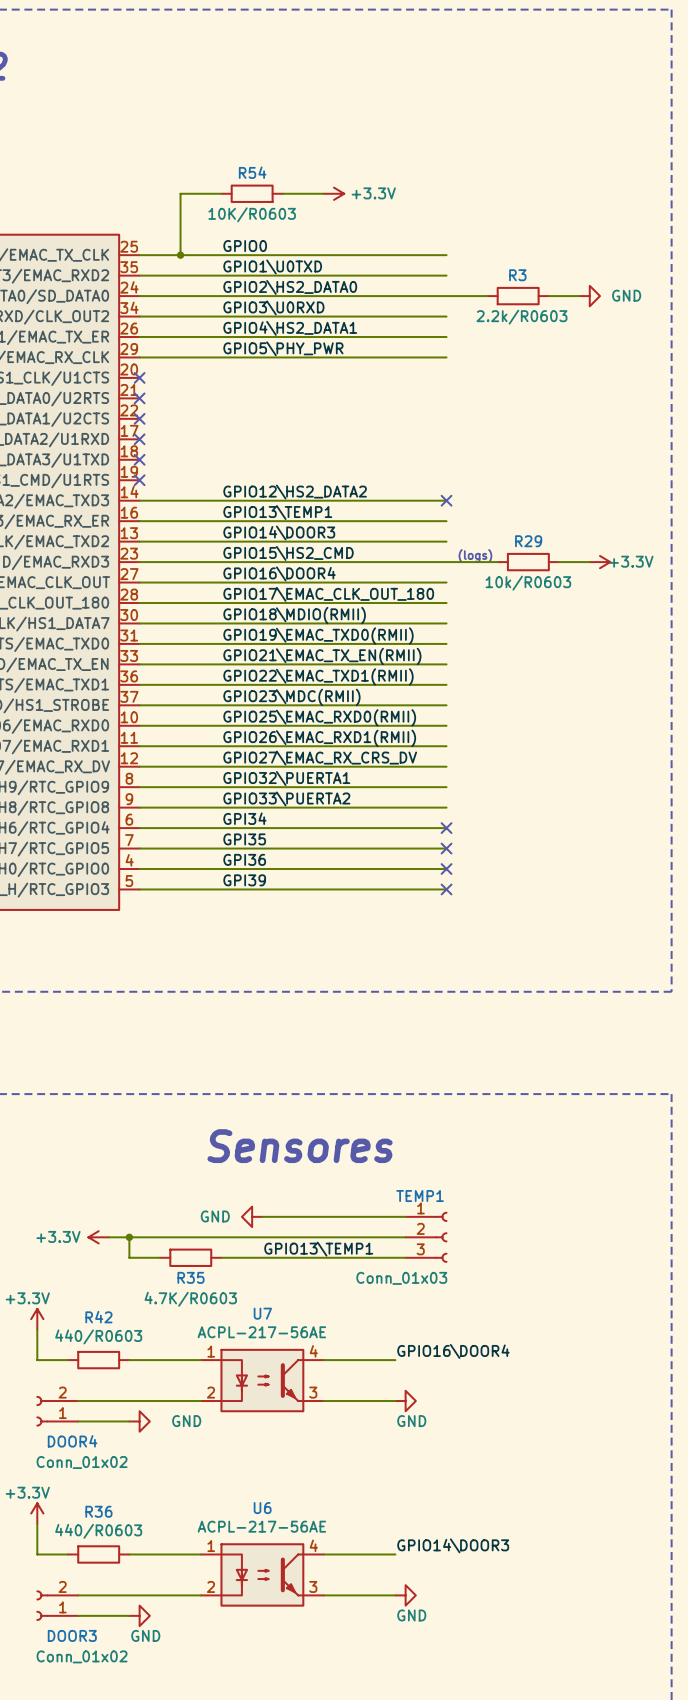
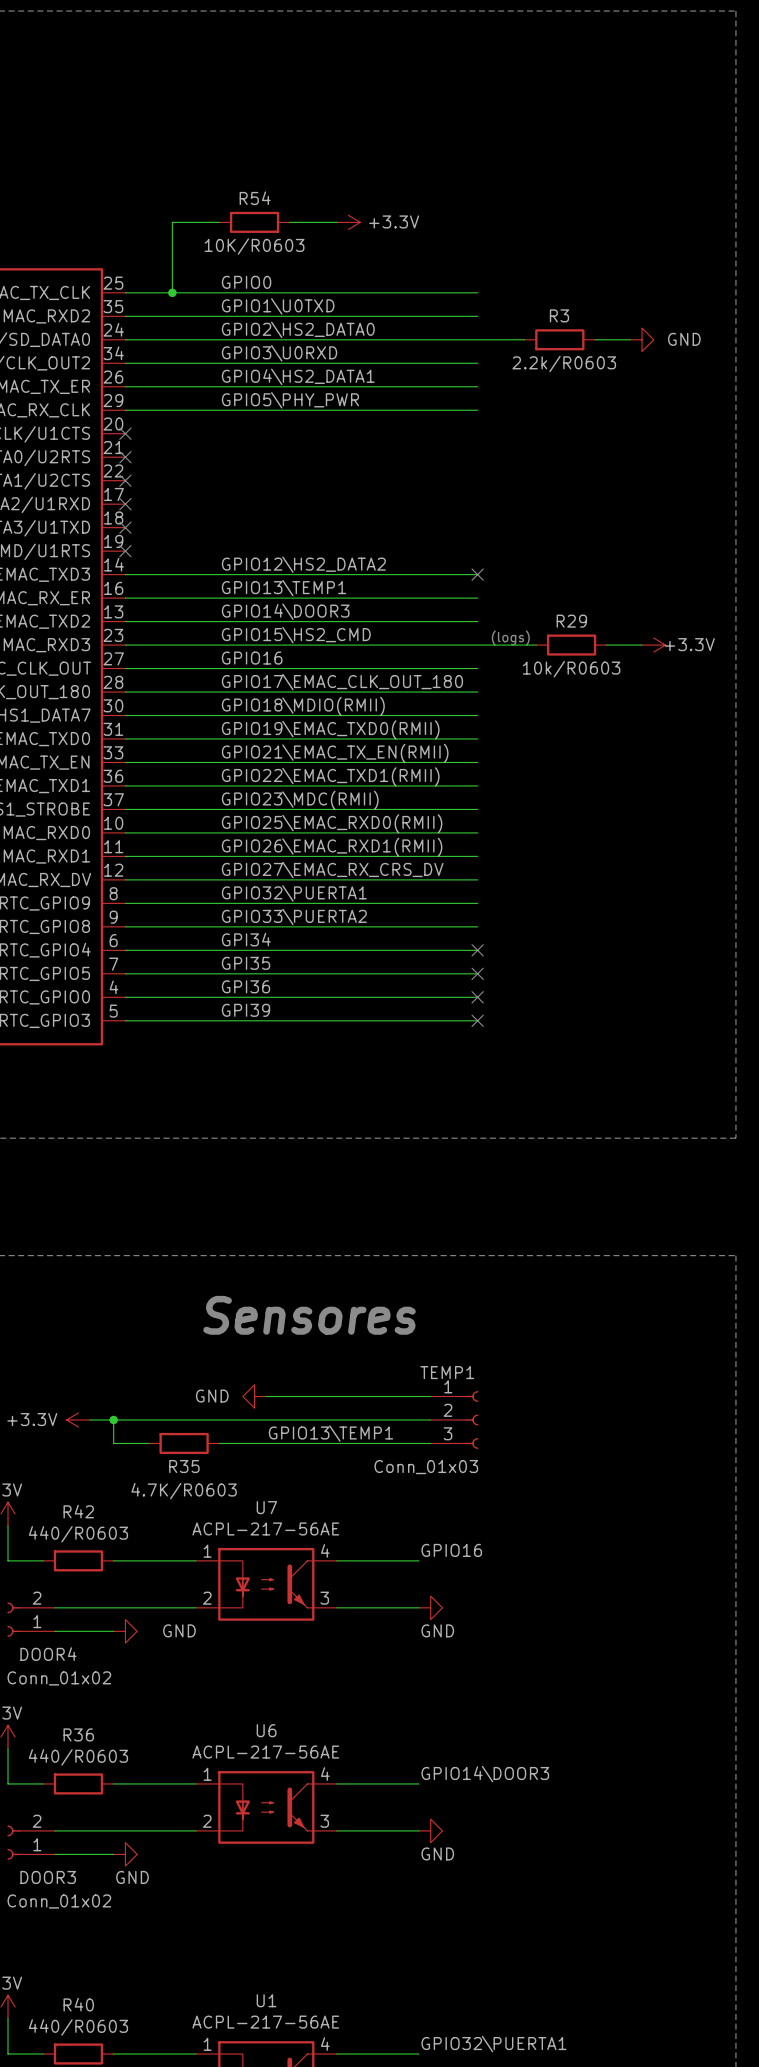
label: GPIO16\DOOR4 (279, 573) -> GPIO16 (252, 658)
label: GPIO16\DOOR4 (453, 1351) -> GPIO16 (451, 1550)

